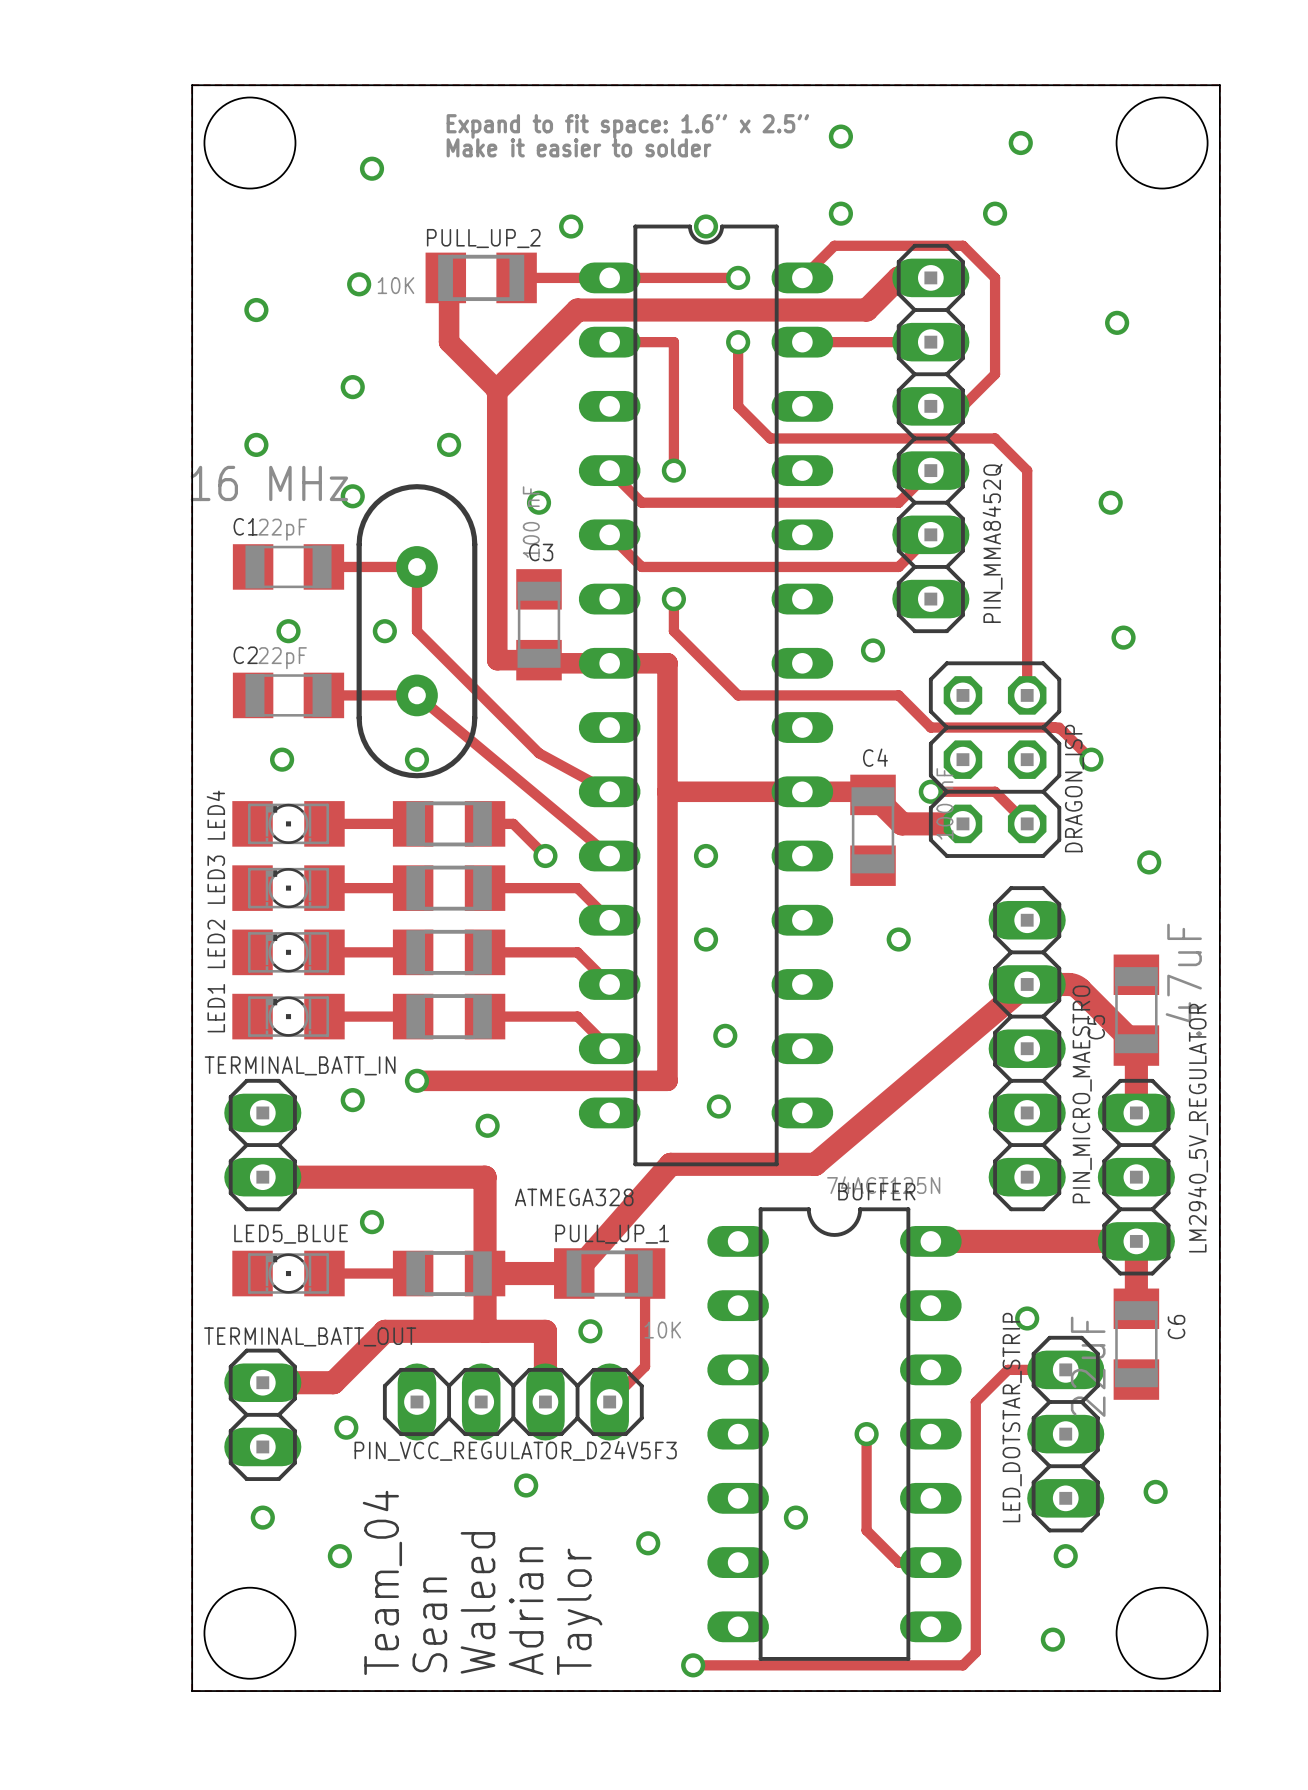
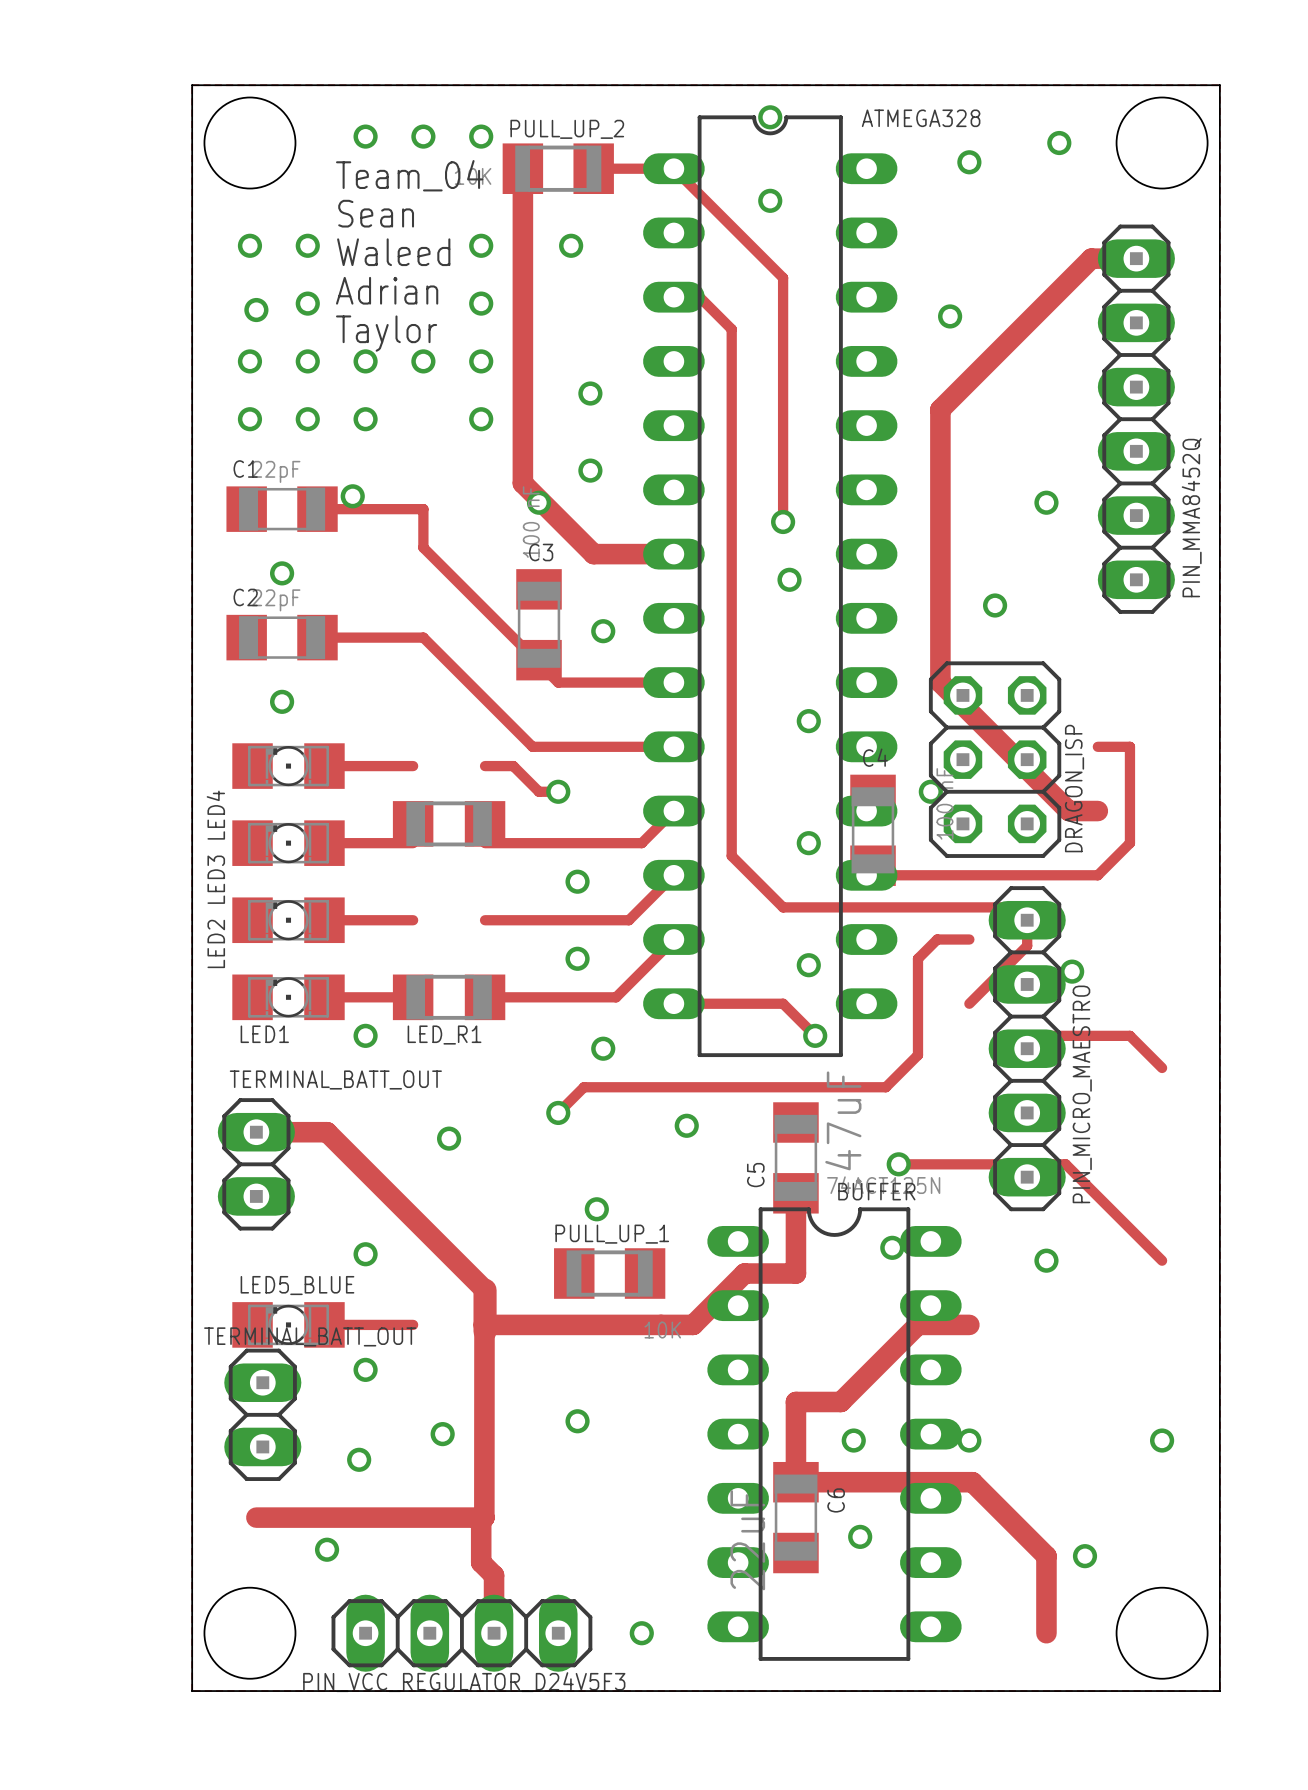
via: none -> (770, 117)
text: Expand to fit space: 1.6'' x 2.5'' (627, 126) -> none
via: none -> (365, 136)
via: none -> (423, 136)
via: none -> (481, 136)
via: (840, 136) -> none
via: (1020, 143) -> none
via: none -> (1059, 143)
text: Make it easier to solder (578, 147) -> none
via: none -> (969, 162)
via: (372, 168) -> none
track: none -> (522, 168) (522, 483) (593, 554) (673, 554)
track: none -> (593, 168) (673, 168) (783, 277) (783, 521)
text: none -> Team_04 (409, 175)
via: none -> (770, 200)
text: none -> Sean (376, 213)
via: (840, 213) -> none
via: (995, 213) -> none
via position: (571, 226) -> (571, 245)
via: (706, 226) -> none
PULL_UP_2 name position: PULL_UP_2 (483, 238) -> PULL_UP_2 (567, 129)
via: none -> (249, 245)
via: none -> (307, 245)
via: none -> (481, 245)
text: none -> Waleed (393, 252)
track: none -> (1136, 258) (1091, 258) (940, 409) (940, 682) (1068, 811) (1097, 811)
track: (445, 277) (449, 281) (449, 342) (497, 390) -> none
PULL_UP_2 position: (481, 277) -> (558, 168)
track: (516, 277) (738, 277) -> none
via: (738, 277) -> none
track: (802, 277) (834, 245) (962, 245) (995, 277) (995, 374) (962, 406) (930, 406) -> none
track: (930, 277) (898, 277) (866, 310) (577, 310) (497, 390) -> none
via: (359, 284) -> none
text: none -> Adrian (387, 290)
track: none -> (673, 297) (699, 297) (731, 329) (731, 856) (783, 907) (1014, 907) (1027, 920) (1027, 945) (969, 1003)
via: none -> (307, 303)
via: none -> (481, 303)
via: none -> (950, 316)
via: (1117, 322) -> none
text: none -> Taylor (386, 333)
track: (609, 342) (673, 342) (673, 470) -> none
track: (738, 342) (738, 406) (770, 438) (995, 438) (1027, 470) (1027, 695) -> none
via: (738, 342) -> none
track: (802, 342) (930, 342) -> none
via: none -> (249, 361)
via: none -> (307, 361)
via: none -> (365, 361)
via: none -> (423, 361)
via: none -> (481, 361)
via: (352, 387) -> none
track: (497, 390) (497, 660) (539, 660) (545, 663) (667, 663) (667, 1080) (416, 1080) -> none
via: none -> (590, 393)
via: none -> (307, 419)
via: none -> (365, 419)
PIN_MMA8452Q position: (930, 438) -> (1136, 419)
via position: (256, 444) -> (249, 419)
via position: (449, 444) -> (481, 419)
via: none -> (590, 470)
track: (609, 470) (641, 502) (898, 502) (930, 470) -> none
via: (673, 470) -> none
via position: (1110, 502) -> (1046, 502)
track: none -> (317, 509) (423, 509) (423, 547) (558, 682) (673, 682)
via: none -> (783, 521)
C1 name position: C1 (245, 526) -> C1 (245, 469)
track: (609, 534) (641, 566) (898, 566) (930, 534) -> none
PIN_MMA8452Q name position: PIN_MMA8452Q (992, 543) -> PIN_MMA8452Q (1191, 517)
C1 position: (288, 566) -> (282, 509)
track: (323, 566) (416, 566) (416, 631) (423, 637) -> (317, 637) (423, 637)
via: none -> (282, 573)
via: none -> (789, 579)
track: (673, 599) (673, 631) (738, 695) (898, 695) (930, 727) (1059, 727) -> none
via: (673, 599) -> none
via: none -> (995, 605)
via: (288, 631) -> none
via: (384, 631) -> none
part: 16 MHz (416, 631) -> none
via: none -> (603, 631)
via: (1123, 637) -> none
via: (873, 650) -> none
C2 name position: C2 (245, 655) -> C2 (245, 597)
C2 position: (288, 695) -> (282, 637)
track: (323, 695) (416, 695) (609, 856) -> none
ATMEGA328 position: (706, 695) -> (770, 586)
via: none -> (282, 701)
via: none -> (808, 721)
track: (1052, 727) (1062, 730) (1091, 759) -> none
track: (532, 746) (539, 753) (609, 791) -> (532, 746) (673, 746)
track: none -> (1097, 746) (1129, 746) (1129, 843) (1097, 875) (866, 875)
via: (282, 759) -> none
via: (416, 759) -> none
via: (1091, 759) -> none
track: none -> (485, 766) (513, 766) (539, 791) (558, 791)
via: none -> (558, 791)
track: (667, 791) (873, 791) (873, 794) (902, 823) (962, 823) -> none
track: (930, 791) (995, 791) (1027, 823) -> none
track: none -> (673, 811) (641, 843) (485, 843)
LED4 position: (288, 823) -> (288, 766)
track: (324, 823) (413, 823) -> (324, 843) (413, 843)
track: (485, 823) (513, 823) (545, 856) -> none
via: none -> (808, 843)
via: (545, 856) -> none
via: (706, 856) -> none
via: (1149, 862) -> none
track: none -> (673, 875) (628, 920) (485, 920)
via: none -> (577, 881)
LED3 position: (288, 888) -> (288, 843)
track: (324, 888) (413, 888) -> (324, 920) (413, 920)
part: (449, 888) -> none
track: (485, 888) (577, 888) (609, 920) -> none
track: none -> (673, 939) (616, 997) (485, 997)
via: (706, 939) -> none
via: (898, 939) -> none
track: none -> (969, 939) (937, 939) (917, 958) (917, 1055) (885, 1087) (583, 1087) (558, 1112)
LED2 position: (288, 952) -> (288, 920)
track: (324, 952) (413, 952) -> (324, 766) (413, 766)
part: (449, 952) -> none
track: (485, 952) (577, 952) (609, 984) -> none
via: none -> (577, 958)
via: none -> (808, 965)
via: none -> (1072, 971)
track: none -> (673, 1003) (783, 1003) (815, 1035)
LED1 name rotation: 0° (216, 1008) -> 90° clockwise (264, 1034)
C5 position: (1136, 1010) -> (795, 1157)
LED1 position: (288, 1016) -> (288, 997)
track: (324, 1016) (413, 1016) -> (324, 997) (413, 997)
LED_R1 position: (449, 1016) -> (449, 997)
track: (485, 1016) (577, 1016) (609, 1048) -> none
via: none -> (365, 1035)
LED_R1 name: none -> LED_R1 (444, 1035)
via: (725, 1035) -> none
via: none -> (815, 1035)
track: none -> (1027, 1035) (1129, 1035) (1162, 1067)
via: none -> (603, 1048)
TERMINAL_BATT_IN name: TERMINAL_BATT_IN (300, 1065) -> TERMINAL_BATT_OUT (335, 1079)
via: (416, 1080) -> none
via: (352, 1100) -> none
via position: (718, 1106) -> (686, 1125)
via: none -> (558, 1112)
track: (1136, 1112) (1136, 1045) (1076, 986) (1068, 984) (1027, 984) (815, 1164) (670, 1164) (574, 1273) (485, 1273) -> none
via: (487, 1125) -> none
via: none -> (449, 1138)
TERMINAL_BATT_IN position: (262, 1145) -> (256, 1164)
track: none -> (898, 1164) (1065, 1164) (1162, 1260)
via: none -> (898, 1164)
track: (262, 1177) (485, 1177) (485, 1290) -> (256, 1132) (327, 1132) (485, 1290)
LM2940_5V_REGULATOR: (1136, 1177) -> none
track: none -> (795, 1193) (795, 1273) (744, 1273) (693, 1324) (484, 1325) (484, 1517)
ATMEGA328 name position: ATMEGA328 (574, 1197) -> ATMEGA328 (921, 118)
via: none -> (596, 1209)
via position: (372, 1222) -> (365, 1254)
LED5_BLUE name position: LED5_BLUE (291, 1234) -> LED5_BLUE (297, 1285)
track: (930, 1241) (1136, 1241) (1136, 1308) -> none
via: none -> (892, 1247)
LED5_BLUE position: (288, 1273) -> (288, 1324)
track: (324, 1273) (413, 1273) -> (324, 1324) (413, 1324)
part: (449, 1273) -> none
track: (645, 1273) (645, 1366) (609, 1401) -> none
via position: (1027, 1318) -> (1046, 1260)
track: none -> (969, 1324) (917, 1324) (840, 1401) (795, 1401) (795, 1482) (972, 1482) (1046, 1556) (1046, 1633)
via: (590, 1331) -> none
C6 position: (1136, 1344) -> (795, 1517)
via: none -> (365, 1369)
track: (1065, 1369) (1007, 1369) (975, 1401) (975, 1652) (962, 1665) (693, 1665) -> none
track: (262, 1382) (333, 1382) (384, 1331) (545, 1331) (545, 1401) -> none
PIN_VCC_REGULATOR_D24V5F3 position: (513, 1401) -> (461, 1633)
via: none -> (577, 1421)
via: (346, 1427) -> none
via: none -> (442, 1434)
track: (866, 1434) (866, 1530) (898, 1562) (930, 1562) -> none
via position: (866, 1434) -> (853, 1440)
LED_DOTSTAR_STRIP: (1065, 1434) -> none
via: none -> (969, 1440)
via: none -> (1162, 1440)
via: none -> (359, 1459)
via: (526, 1485) -> none
via: (1155, 1491) -> none
track: none -> (256, 1517) (484, 1517)
via: (262, 1517) -> none
track: none -> (484, 1517) (481, 1520) (481, 1562) (494, 1575) (494, 1633)
via: (795, 1517) -> none
via: none -> (860, 1536)
via: (648, 1543) -> none
via position: (339, 1556) -> (327, 1549)
via position: (1065, 1556) -> (1085, 1556)
text: Team_04 (382, 1582) -> none
text: Waleed (477, 1602) -> none
text: Adrian (526, 1611) -> none
text: Taylor (579, 1611) -> none
text: Sean (429, 1624) -> none
via: none -> (641, 1633)
via: (1052, 1639) -> none
via: (693, 1665) -> none

